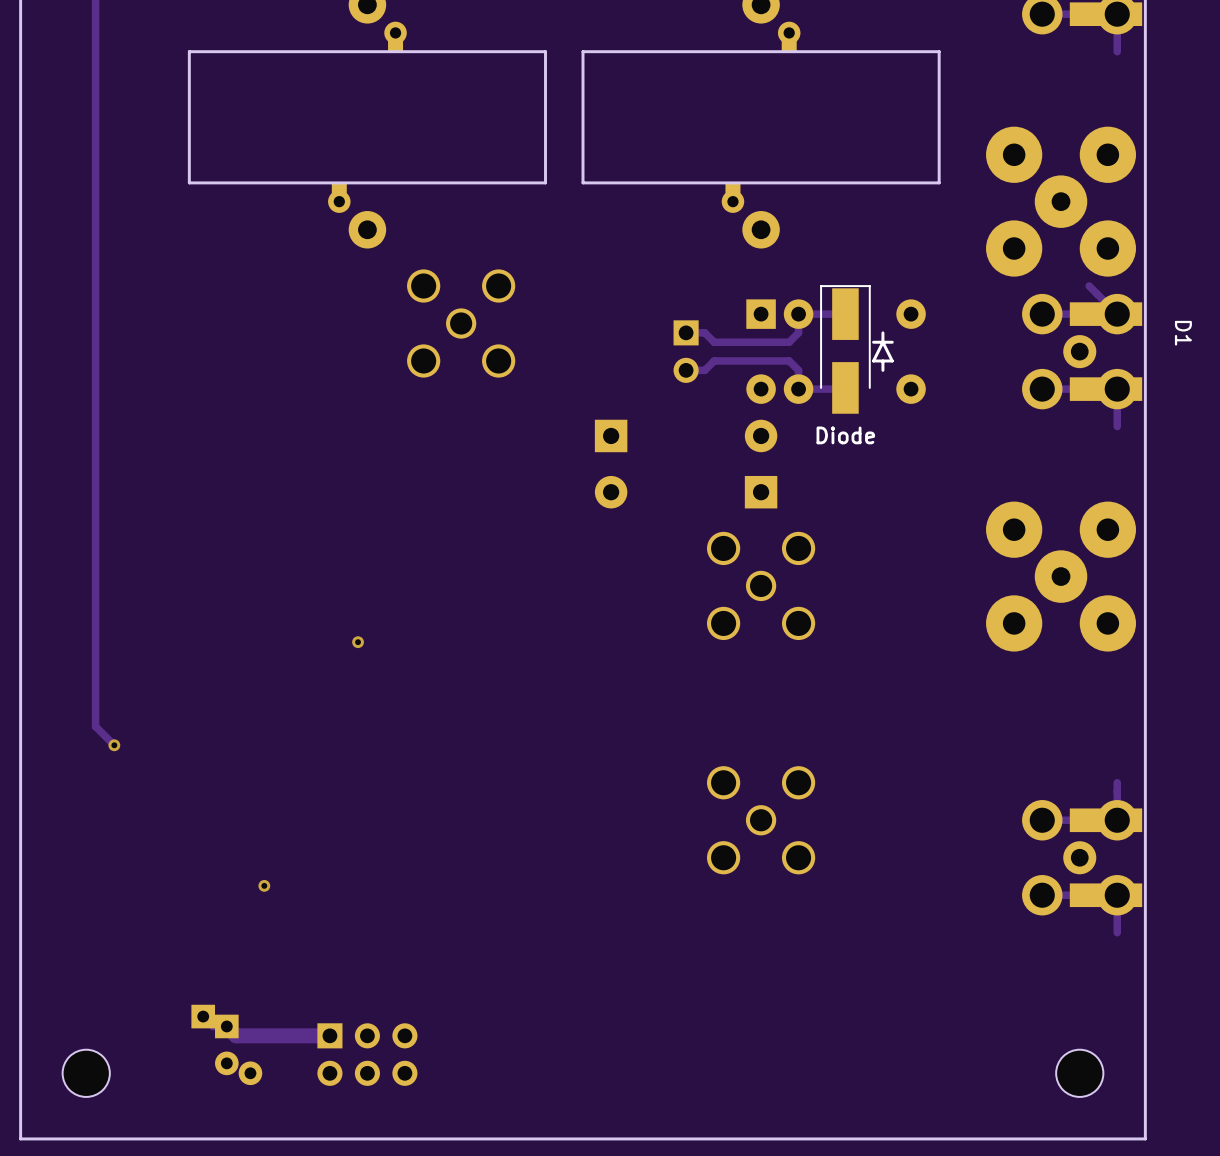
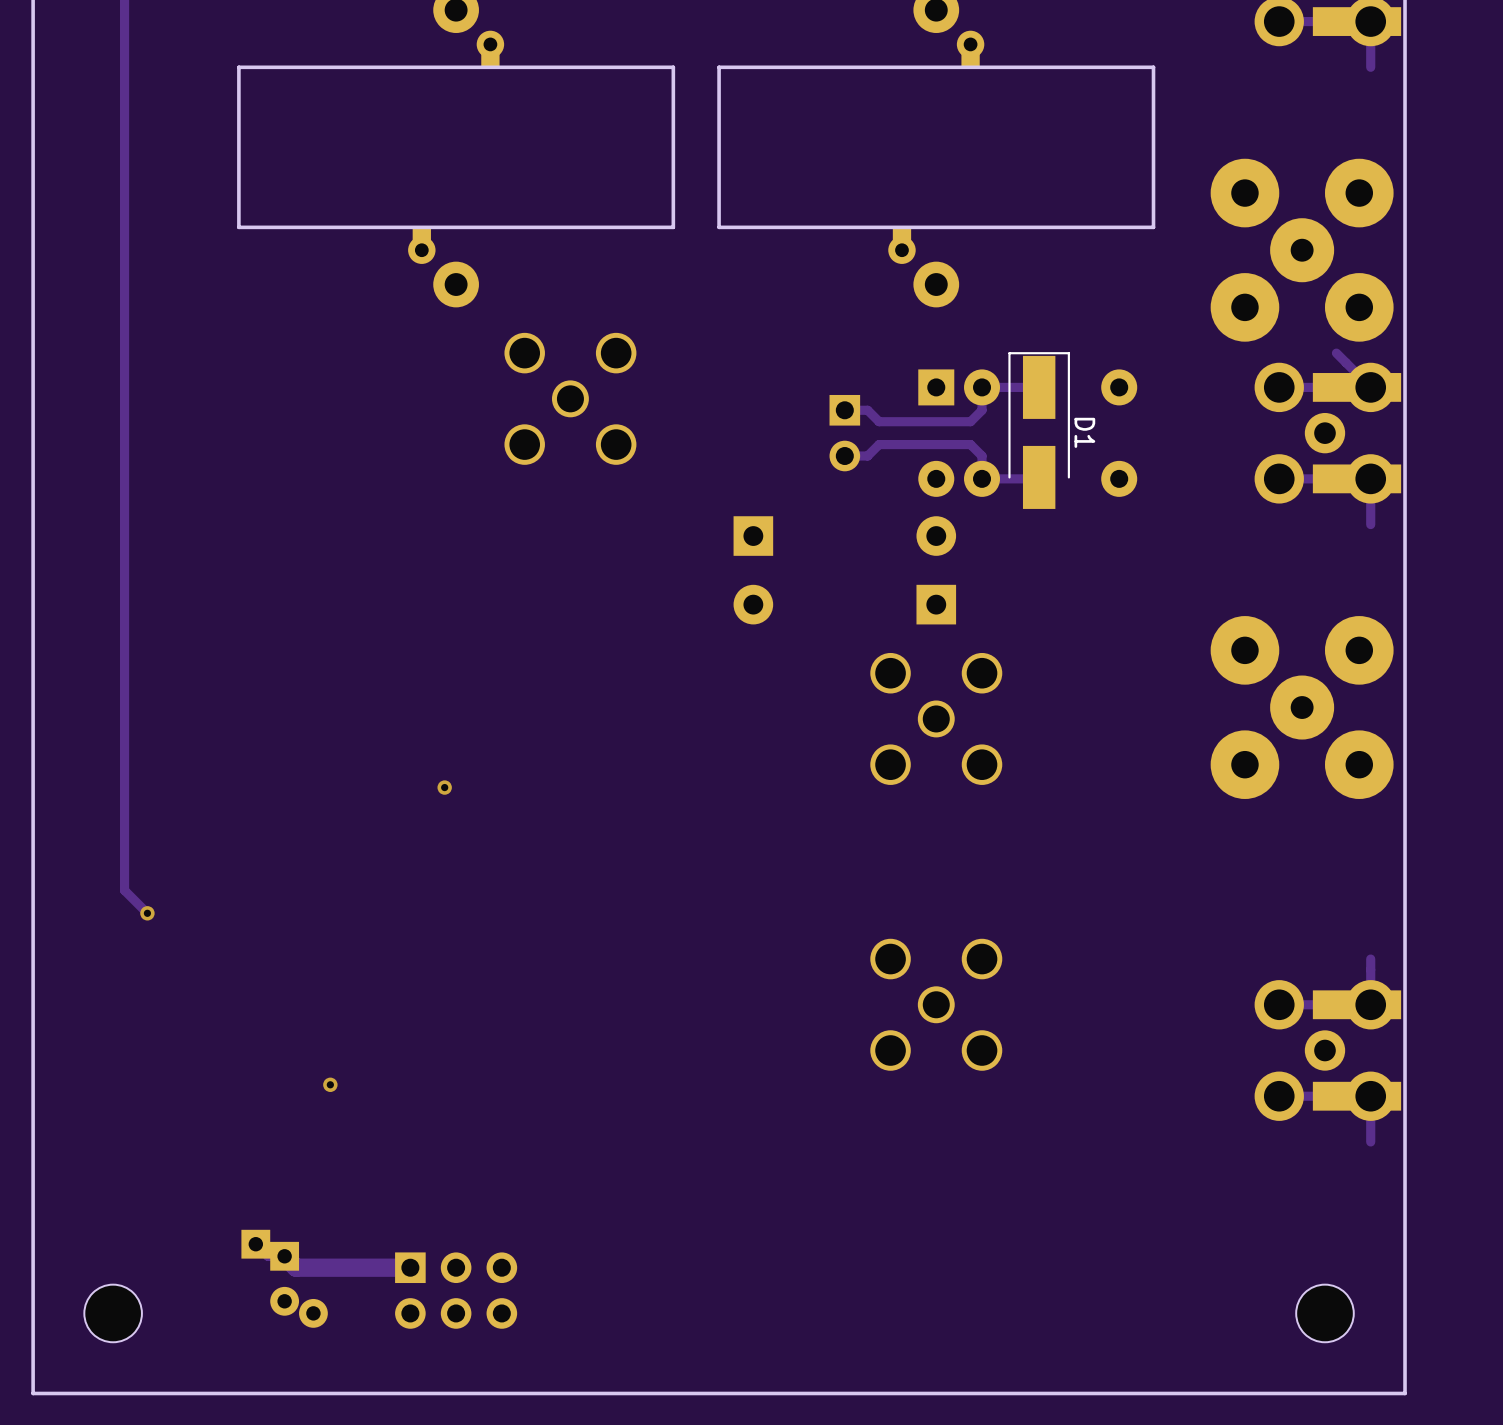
line: (882, 332) (882, 342) -> none
D1 name position: D1 (1183, 333) -> D1 (1084, 432)
line: (882, 342) (873, 360) (892, 360) (882, 342) -> none
line: (892, 342) (873, 342) -> none
line: (882, 360) (882, 370) -> none
text: Diode (845, 435) -> none

